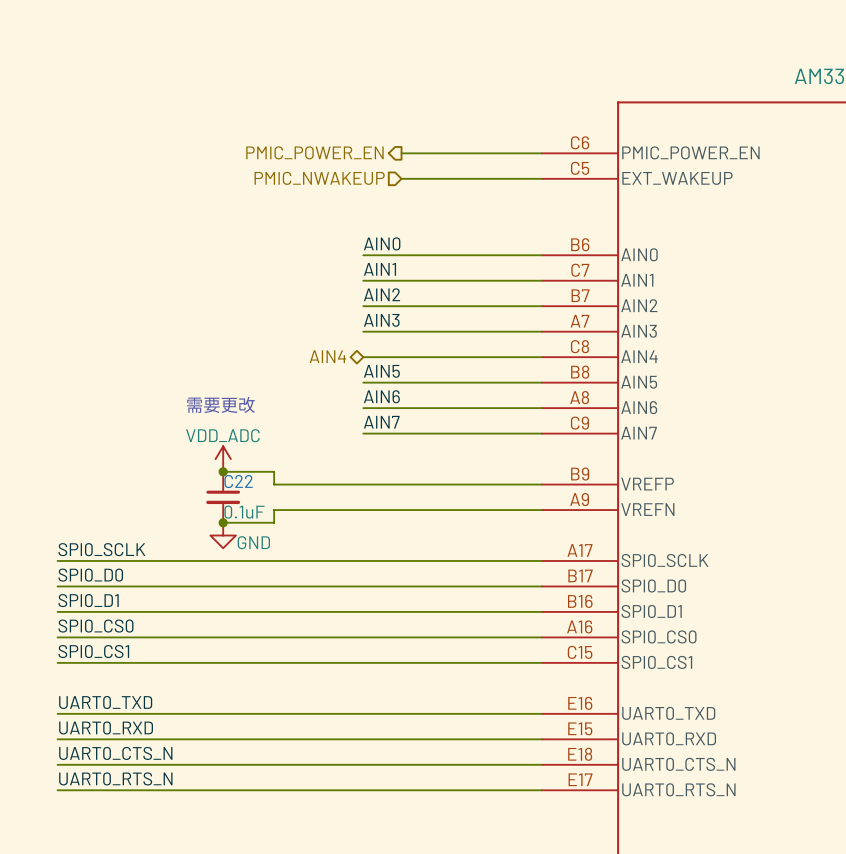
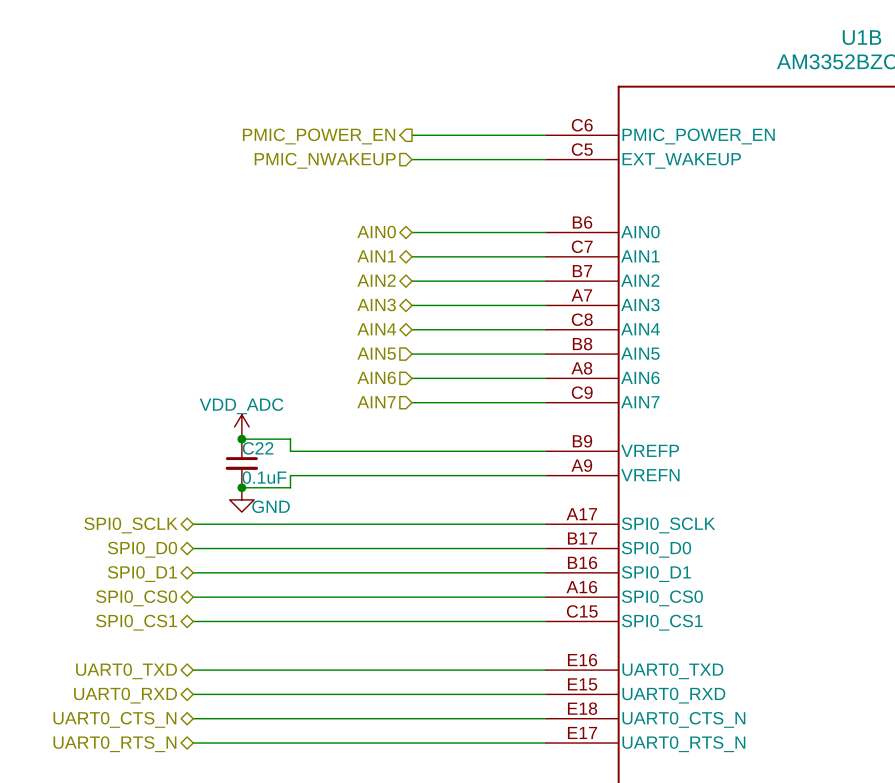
label: AIN0 (382, 243) -> none
hierarchical label: none -> AIN0 (376, 232)
wire: (363, 255) (401, 255) -> none
label: AIN1 (379, 269) -> none
wire: (363, 280) (401, 280) -> none
hierarchical label: none -> AIN1 (376, 256)
label: AIN2 (381, 294) -> none
hierarchical label: none -> AIN2 (376, 280)
wire: (363, 306) (401, 306) -> none
label: AIN3 (381, 320) -> none
wire: (363, 331) (401, 331) -> none
hierarchical label: none -> AIN3 (376, 304)
hierarchical label position: AIN4 (327, 356) -> AIN4 (376, 329)
wire: (363, 357) (401, 357) -> none
label: AIN5 (381, 371) -> none
wire: (363, 382) (401, 382) -> none
hierarchical label: none -> AIN5 (376, 353)
label: AIN6 (381, 396) -> none
text: 需要更改 (220, 404) -> none
hierarchical label: none -> AIN6 (376, 377)
wire: (363, 408) (401, 408) -> none
label: AIN7 (381, 422) -> none
wire: (363, 433) (401, 433) -> none
hierarchical label: none -> AIN7 (376, 402)
label: SPI0_SCLK (101, 549) -> none
wire: (57, 560) (172, 560) -> none
hierarchical label: none -> SPI0_SCLK (130, 525)
label: SPI0_D0 (90, 575) -> none
wire: (57, 586) (172, 586) -> none
hierarchical label: none -> SPI0_D0 (142, 549)
label: SPI0_D1 (88, 600) -> none
wire: (57, 611) (172, 611) -> none
hierarchical label: none -> SPI0_D1 (142, 574)
label: SPI0_CS0 (95, 626) -> none
hierarchical label: none -> SPI0_CS0 (136, 598)
wire: (57, 637) (172, 637) -> none
label: SPI0_CS1 (93, 651) -> none
wire: (57, 662) (172, 662) -> none
hierarchical label: none -> SPI0_CS1 (136, 622)
label: UART0_TXD (105, 702) -> none
wire: (57, 713) (172, 713) -> none
hierarchical label: none -> UART0_TXD (126, 671)
label: UART0_RXD (106, 727) -> none
hierarchical label: none -> UART0_RXD (125, 695)
wire: (57, 739) (172, 739) -> none
label: UART0_CTS_N (115, 753) -> none
wire: (57, 764) (172, 764) -> none
hierarchical label: none -> UART0_CTS_N (114, 719)
label: UART0_RTS_N (115, 778) -> none
hierarchical label: none -> UART0_RTS_N (114, 744)
wire: (57, 790) (172, 790) -> none

